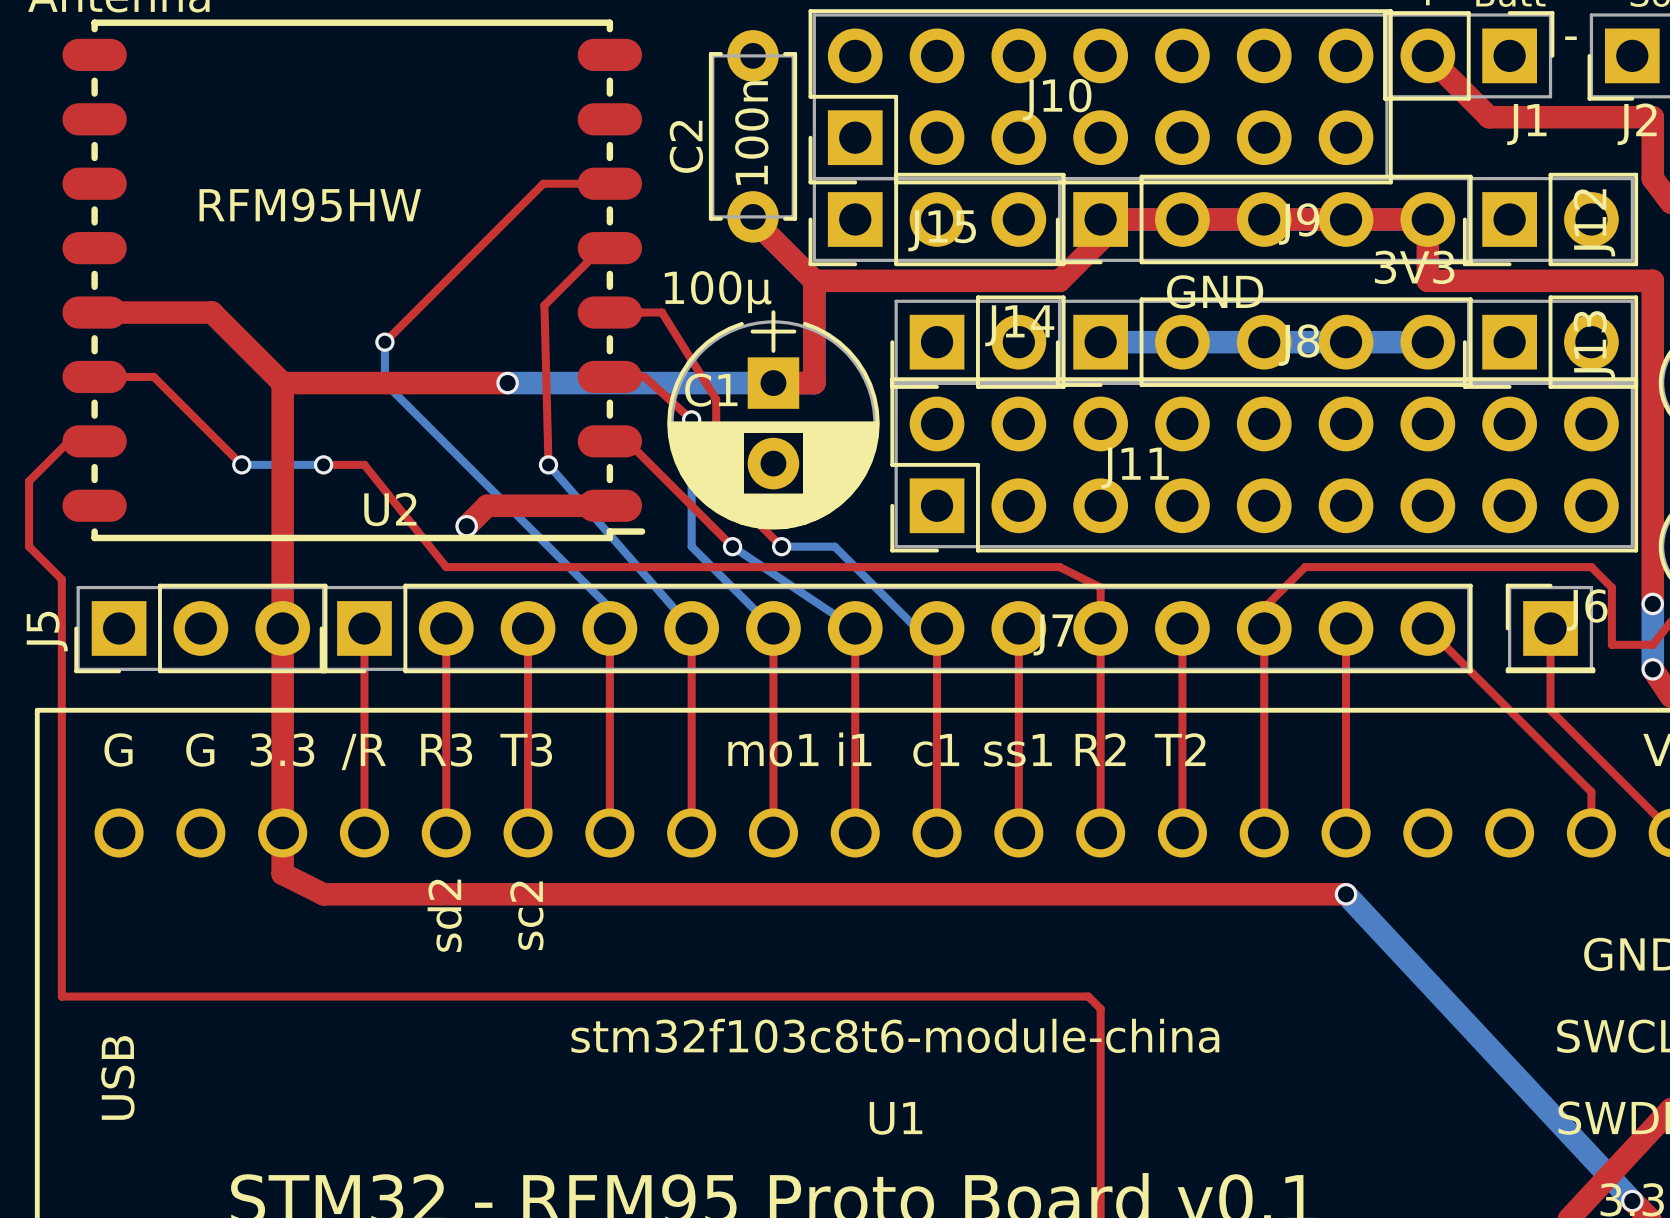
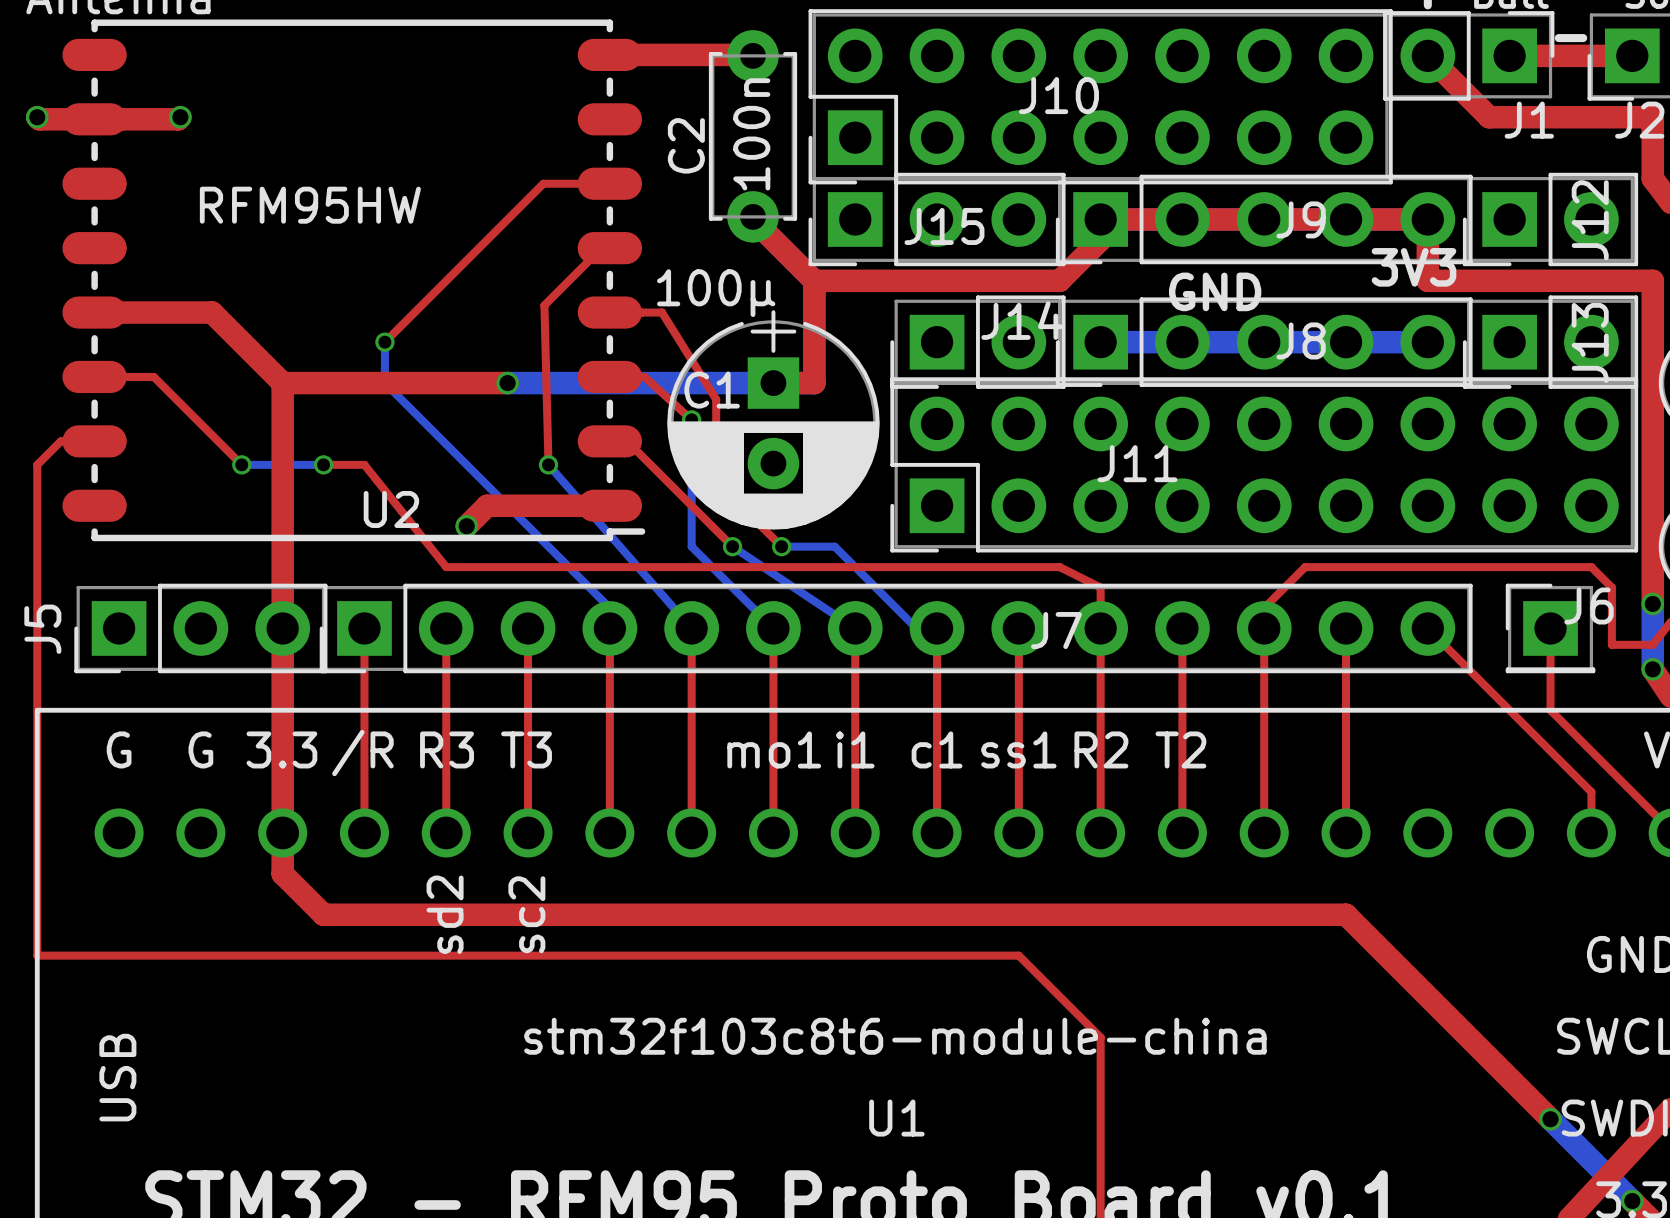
top track: none -> (752, 54) (610, 55)
top track: none -> (1509, 55) (1632, 55)
top track: none -> (37, 117) (39, 119) (178, 119) (180, 117)
via: none -> (37, 117)
via: none -> (180, 117)
top track: (68, 441) (29, 481) (29, 546) (61, 579) (61, 996) (1088, 996) (1100, 1008) (1100, 1037) -> (68, 441) (60, 441) (37, 464) (37, 955) (1018, 955) (1100, 1037)
top track: (282, 873) (323, 894) (1346, 894) -> (282, 873) (323, 914) (1346, 914) (1550, 1119)
bottom track: (1346, 894) (1632, 1201) -> (1550, 1119) (1632, 1201)
via: (1346, 894) -> none
via: none -> (1550, 1119)

